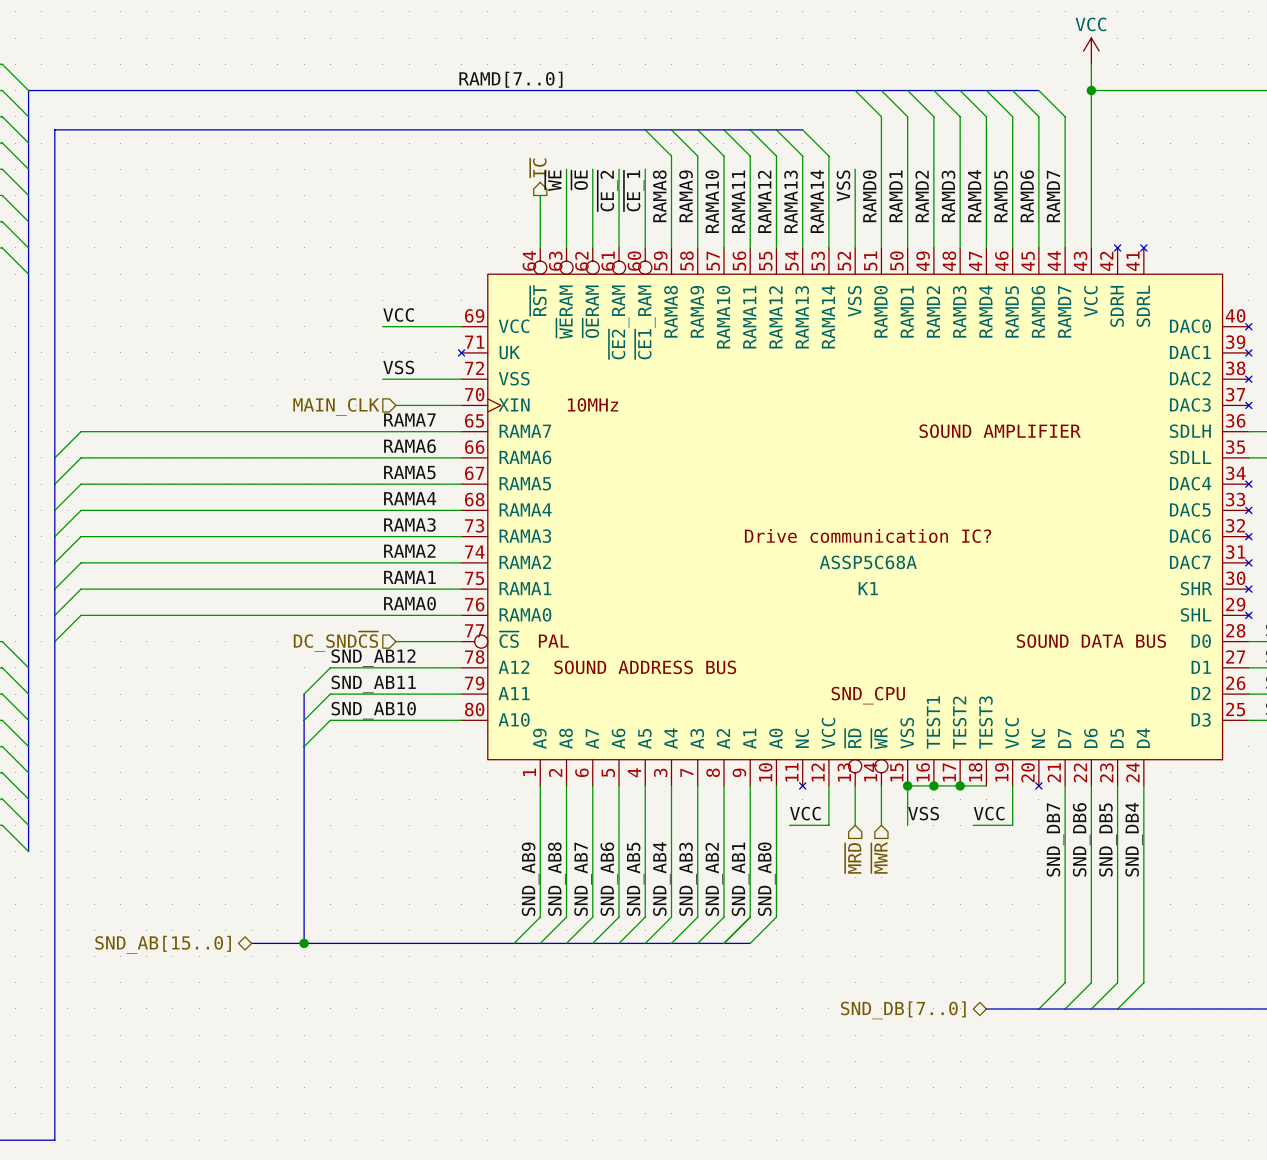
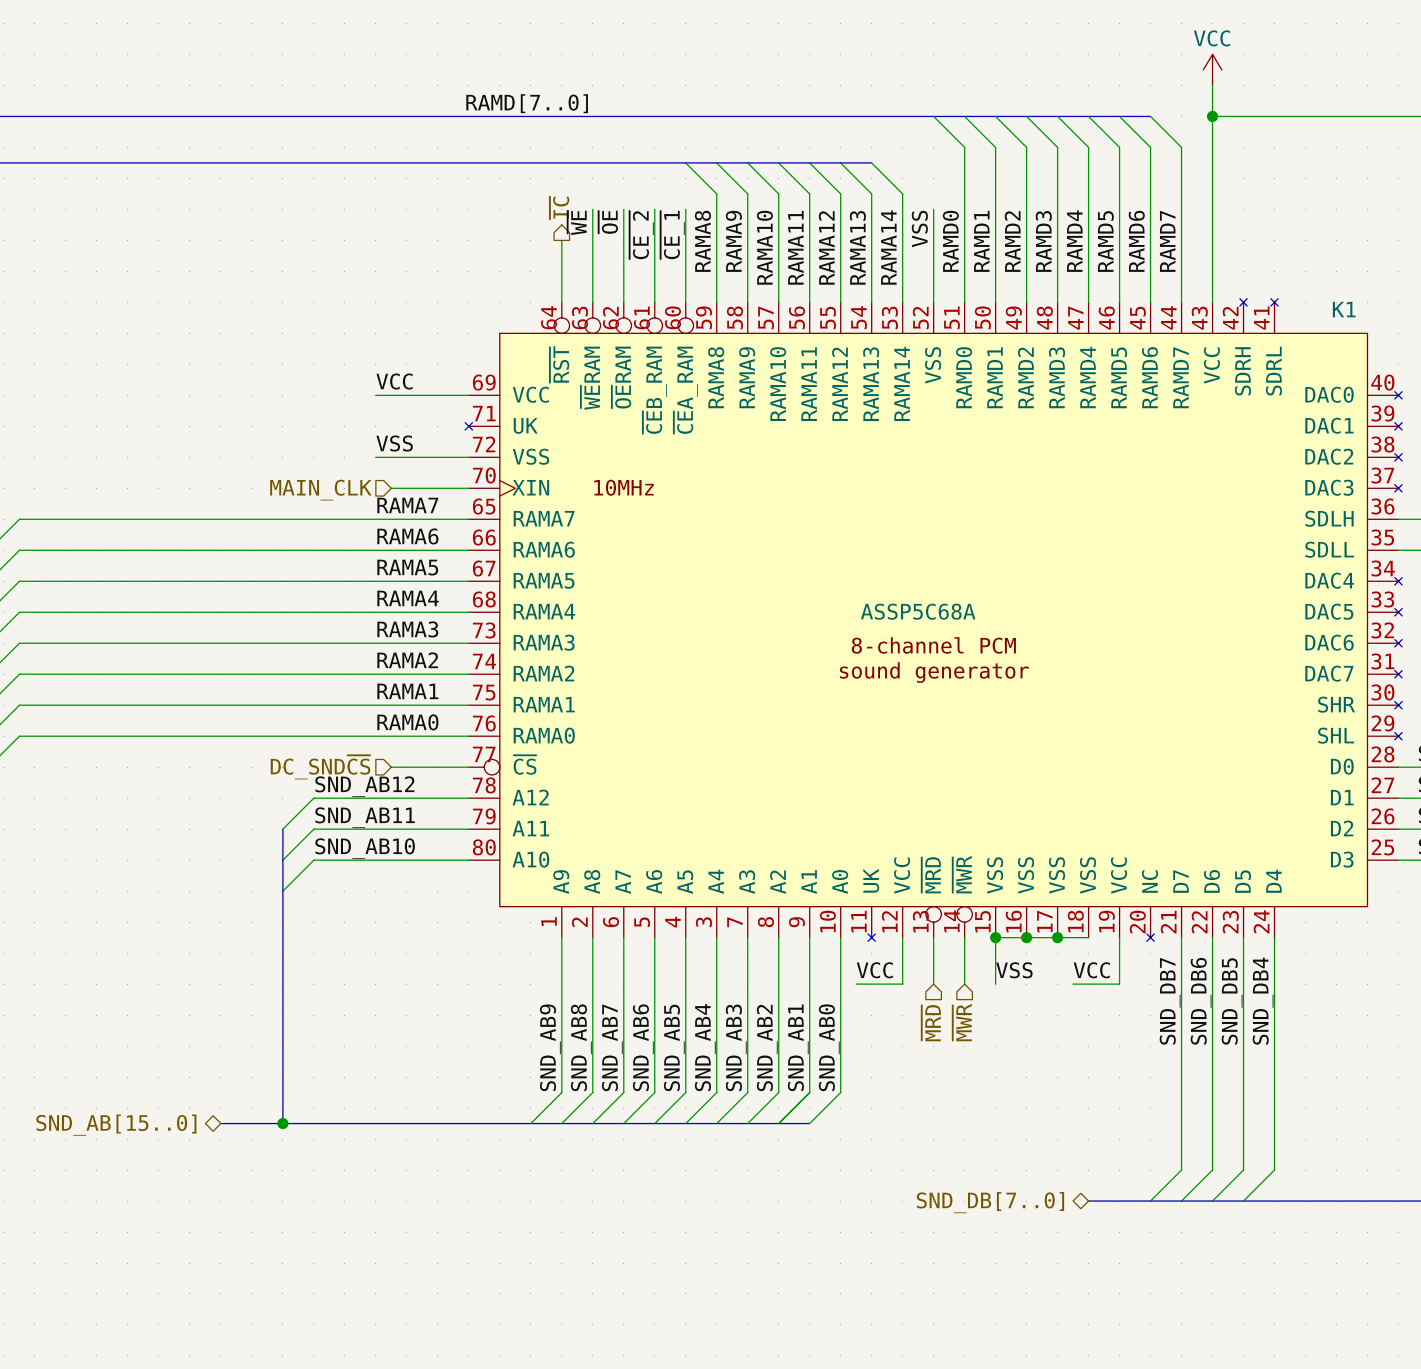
K1 symbol: [458, 244, 1252, 790] -> [465, 298, 1403, 942]
K1 value position: ASSP5C68A (868, 562) -> ASSP5C68A (918, 611)
K1 name position: K1 (868, 588) -> K1 (1344, 309)

